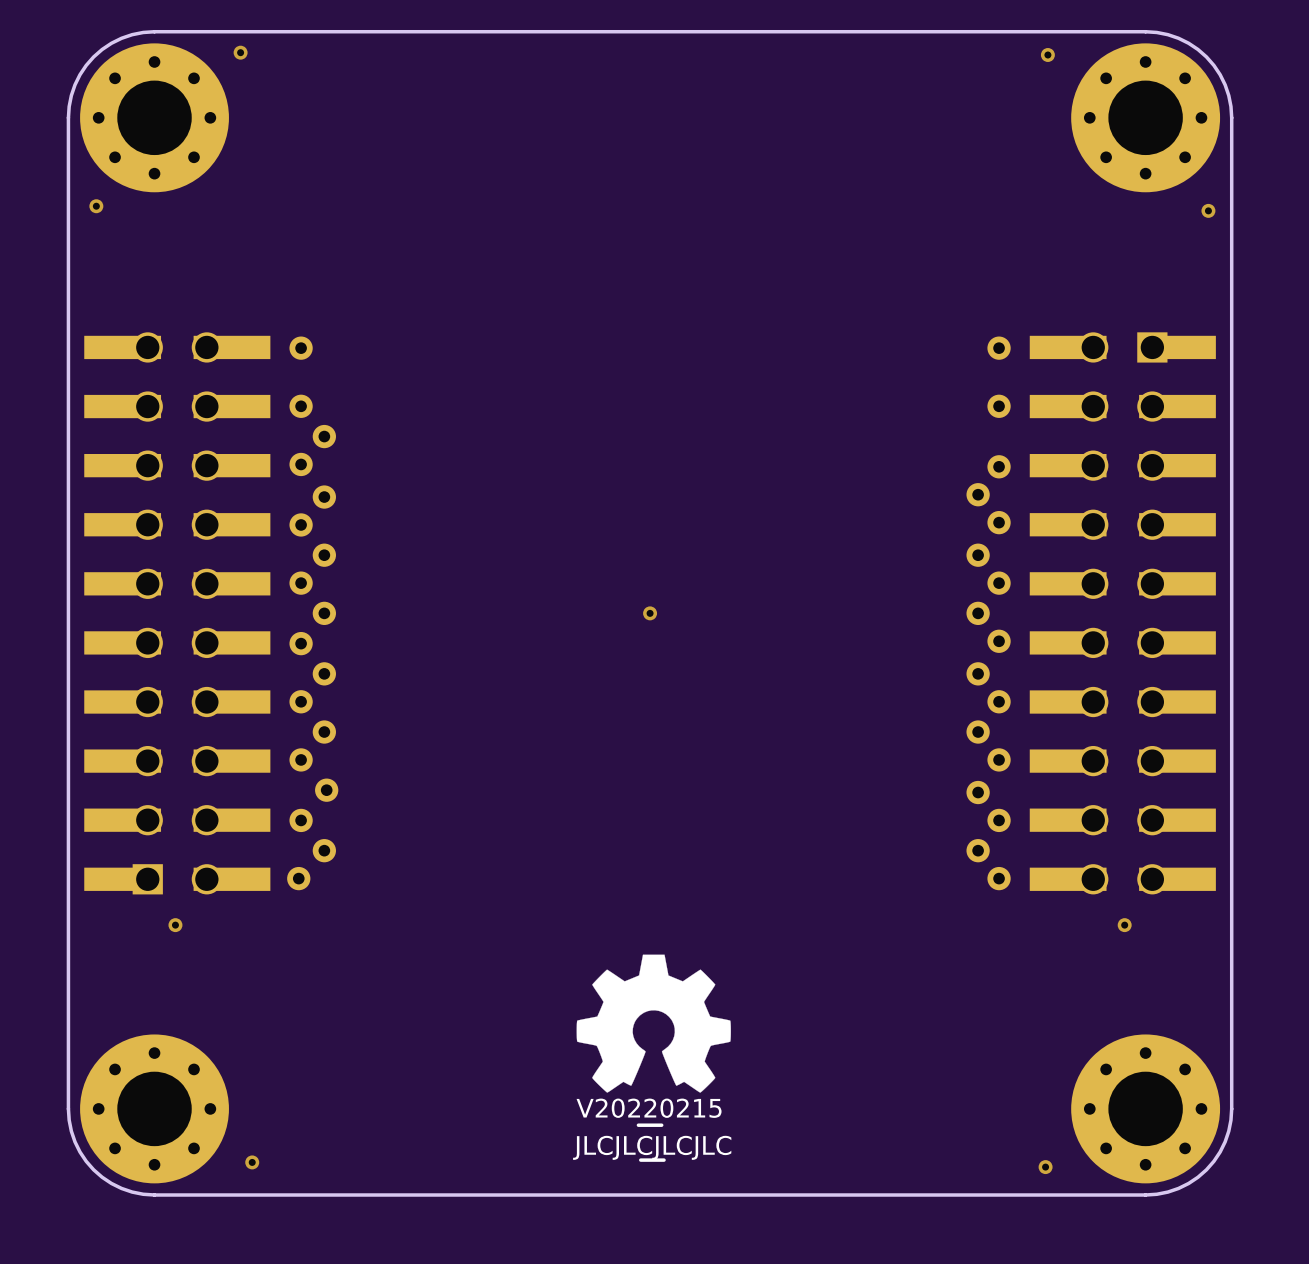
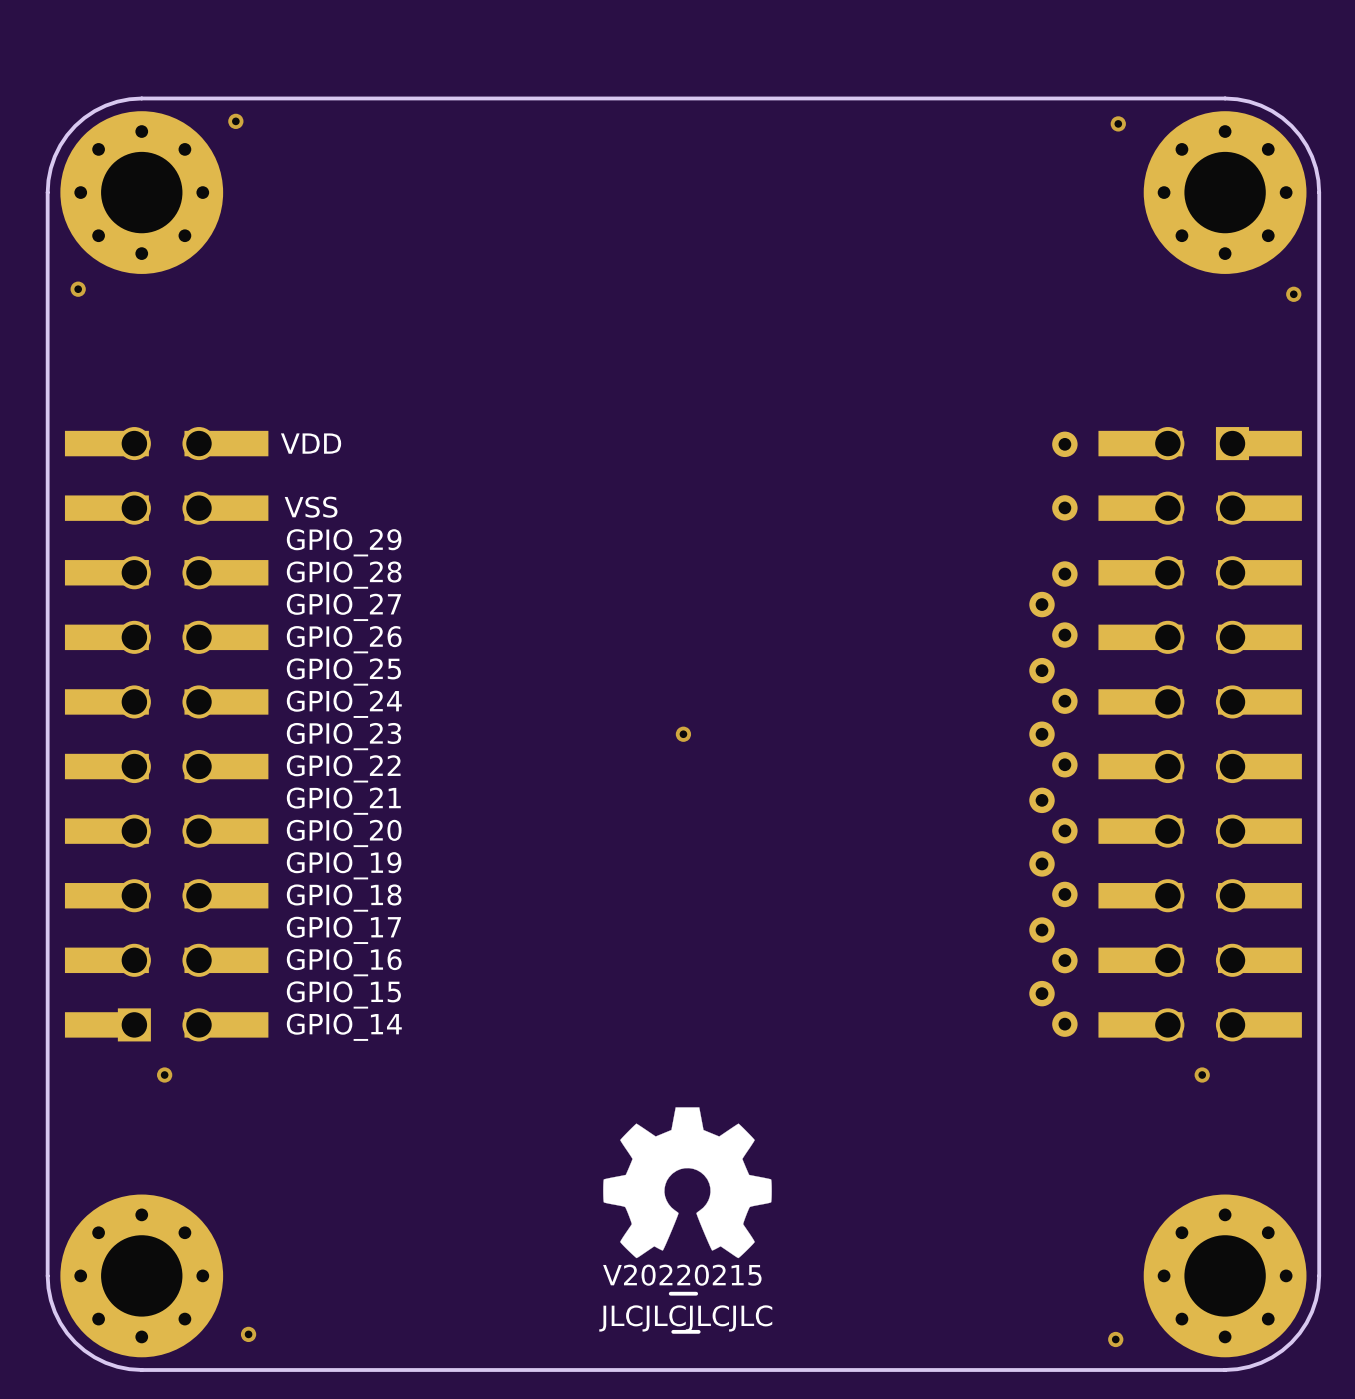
part footprint: [84, 332, 271, 895] -> [64, 427, 269, 1042]
part: (301, 348) -> none
part: (301, 406) -> none
part: (324, 436) -> none
part: (301, 464) -> none
part: (324, 497) -> none
part: (301, 524) -> none
part: (324, 555) -> none
part: (301, 583) -> none
part: (324, 613) -> none
part: (301, 643) -> none
part: (324, 673) -> none
part: (301, 701) -> none
part: (324, 732) -> none
part: (301, 759) -> none
part: (326, 790) -> none
part: (301, 820) -> none
part: (324, 850) -> none
part: (298, 878) -> none

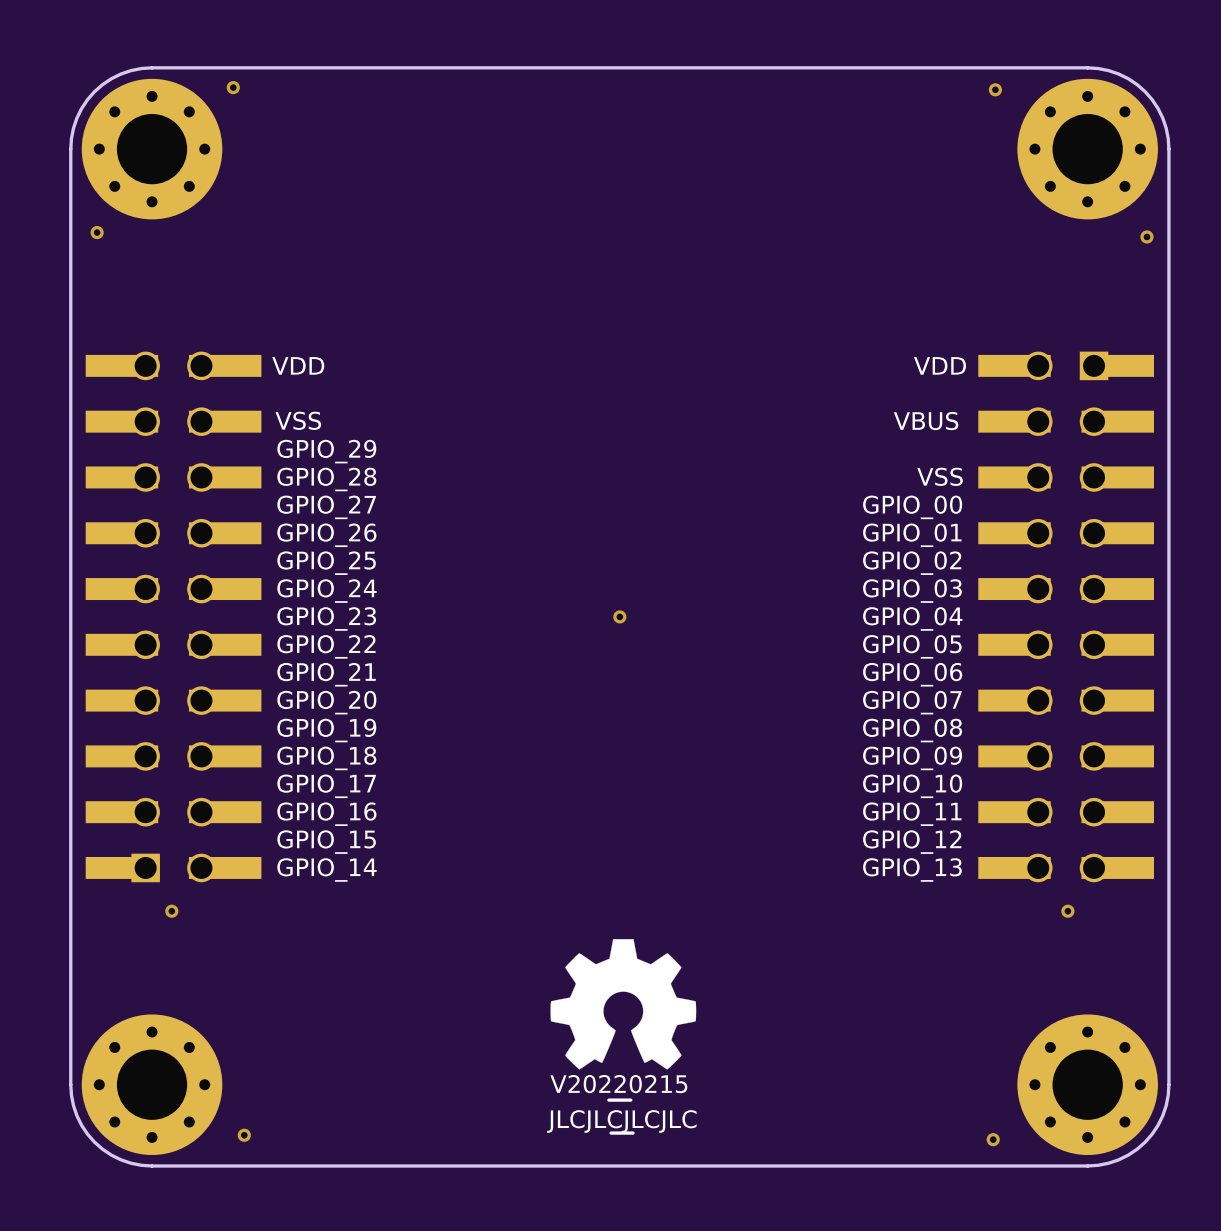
part footprint: [1098, 427, 1302, 1042] -> [978, 351, 1154, 883]
part: (1064, 444) -> none
part: (1064, 507) -> none
part: (1064, 574) -> none
part: (1042, 604) -> none
part: (1064, 635) -> none
part: (1042, 670) -> none
part: (1064, 701) -> none
part: (1042, 734) -> none
part: (1064, 764) -> none
part: (1042, 800) -> none
part: (1064, 830) -> none
part: (1042, 863) -> none
part: (1064, 894) -> none
part: (1042, 930) -> none
part: (1064, 960) -> none
part: (1042, 993) -> none
part: (1064, 1024) -> none

